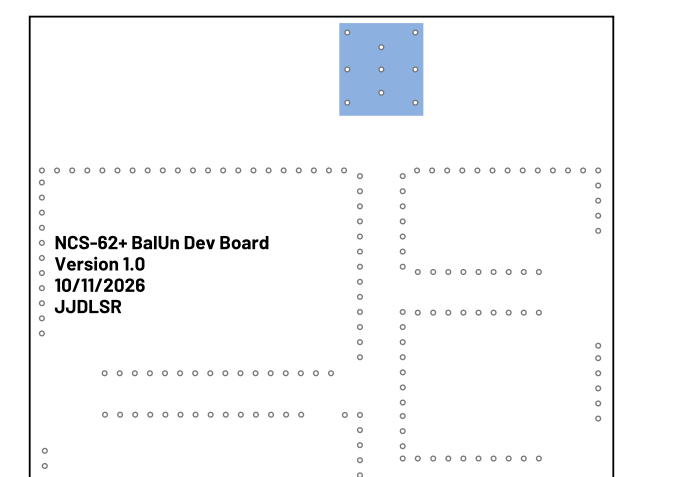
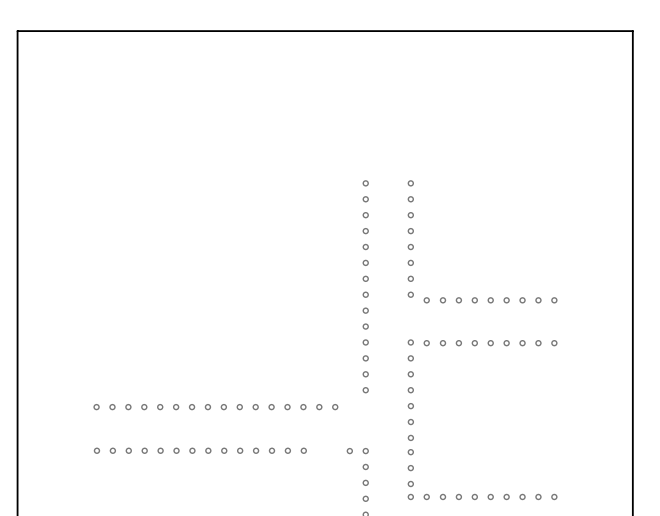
via: (347, 32) -> none
via: (415, 32) -> none
via: (381, 47) -> none
via: (347, 69) -> none
part: (381, 69) -> none
via: (381, 69) -> none
via: (415, 69) -> none
via: (381, 92) -> none
via: (347, 102) -> none
via: (415, 102) -> none
via: none -> (365, 183)
via: none -> (410, 183)
via: (41, 170) -> none
via: (57, 170) -> none
via: (72, 170) -> none
via: (87, 170) -> none
via: (102, 170) -> none
via: (117, 170) -> none
via: (132, 170) -> none
via: (147, 170) -> none
via: (162, 170) -> none
via: (177, 170) -> none
via: (192, 170) -> none
via: (208, 170) -> none
via: (223, 170) -> none
via: (238, 170) -> none
via: (253, 170) -> none
via: (268, 170) -> none
via: (283, 170) -> none
via: (298, 170) -> none
via: (313, 170) -> none
via: (328, 170) -> none
via: (344, 170) -> none
via: (417, 170) -> none
via: (432, 170) -> none
via: (447, 170) -> none
via: (462, 170) -> none
via: (477, 170) -> none
via: (492, 170) -> none
via: (507, 170) -> none
via: (522, 170) -> none
via: (537, 170) -> none
via: (552, 170) -> none
via: (567, 170) -> none
via: (583, 170) -> none
via: (598, 170) -> none
via: (41, 182) -> none
via: (598, 185) -> none
via: (41, 197) -> none
via: (598, 200) -> none
via: (41, 212) -> none
via: (598, 215) -> none
via: (41, 227) -> none
via: (598, 230) -> none
via: (41, 242) -> none
text: NCS-62+ BalUn Dev Board (162, 242) -> none
via: (41, 257) -> none
text: Version 1.0 (99, 263) -> none
via: (41, 273) -> none
text: 10/11/2026 (99, 285) -> none
via: (41, 288) -> none
via: (41, 303) -> none
text: JJDLSR (88, 306) -> none
via: (41, 318) -> none
via: (41, 333) -> none
via: (598, 345) -> none
via: (598, 358) -> none
via: (598, 373) -> none
via: (598, 388) -> none
via: (598, 403) -> none
via: (598, 418) -> none
via: (44, 450) -> none
via: (44, 465) -> none

